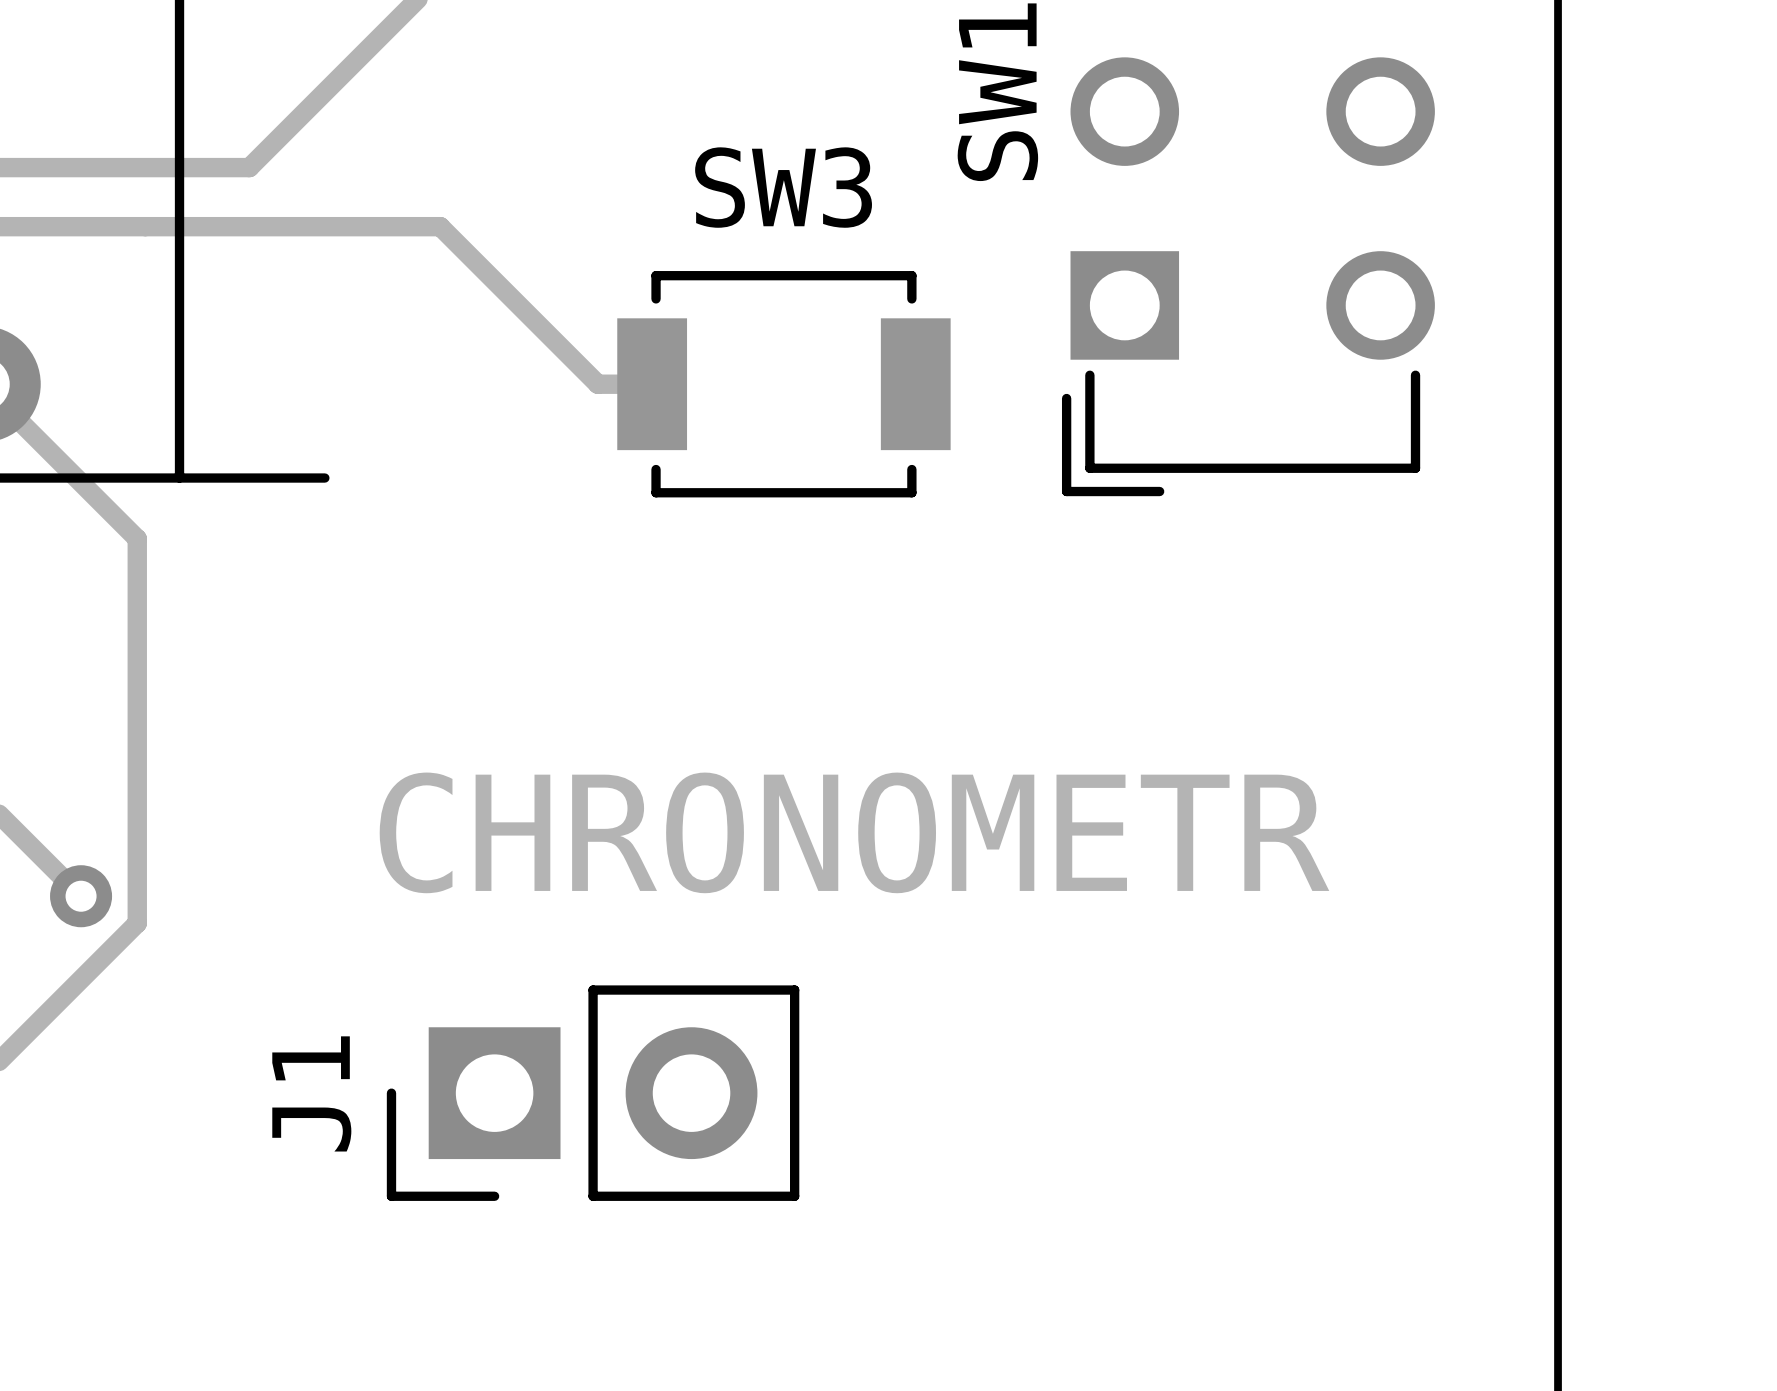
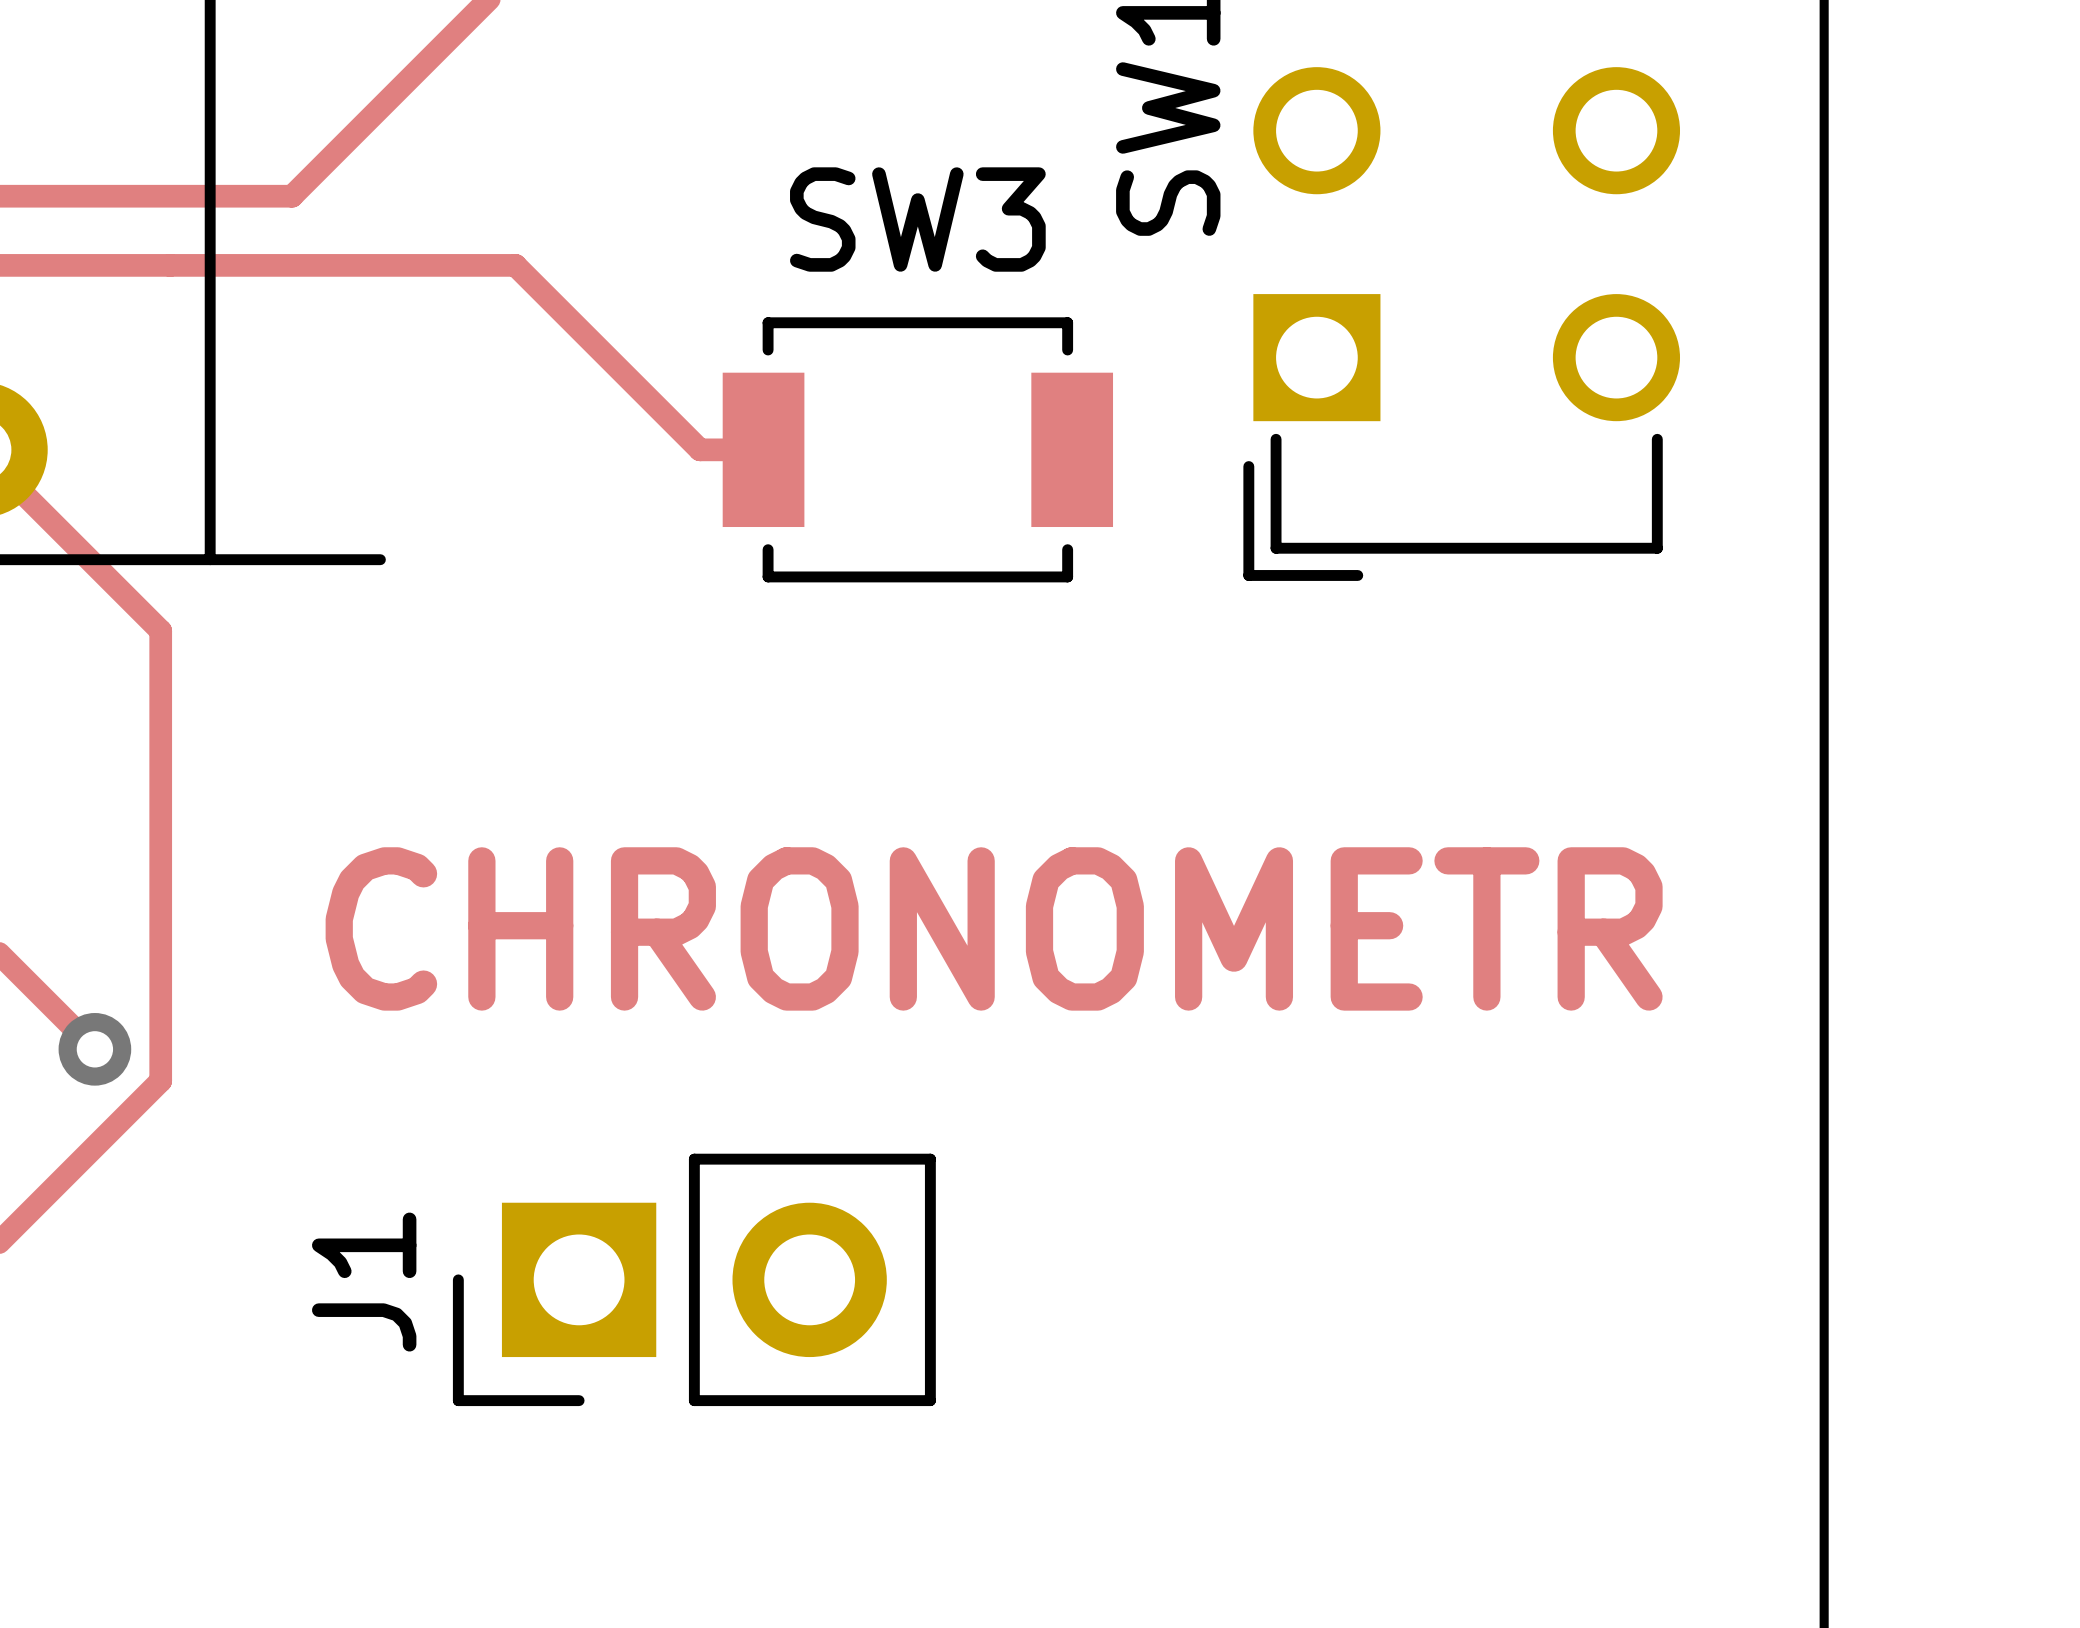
text position: CHRONOMETR (854, 832) -> CHRONOMETR (994, 928)

